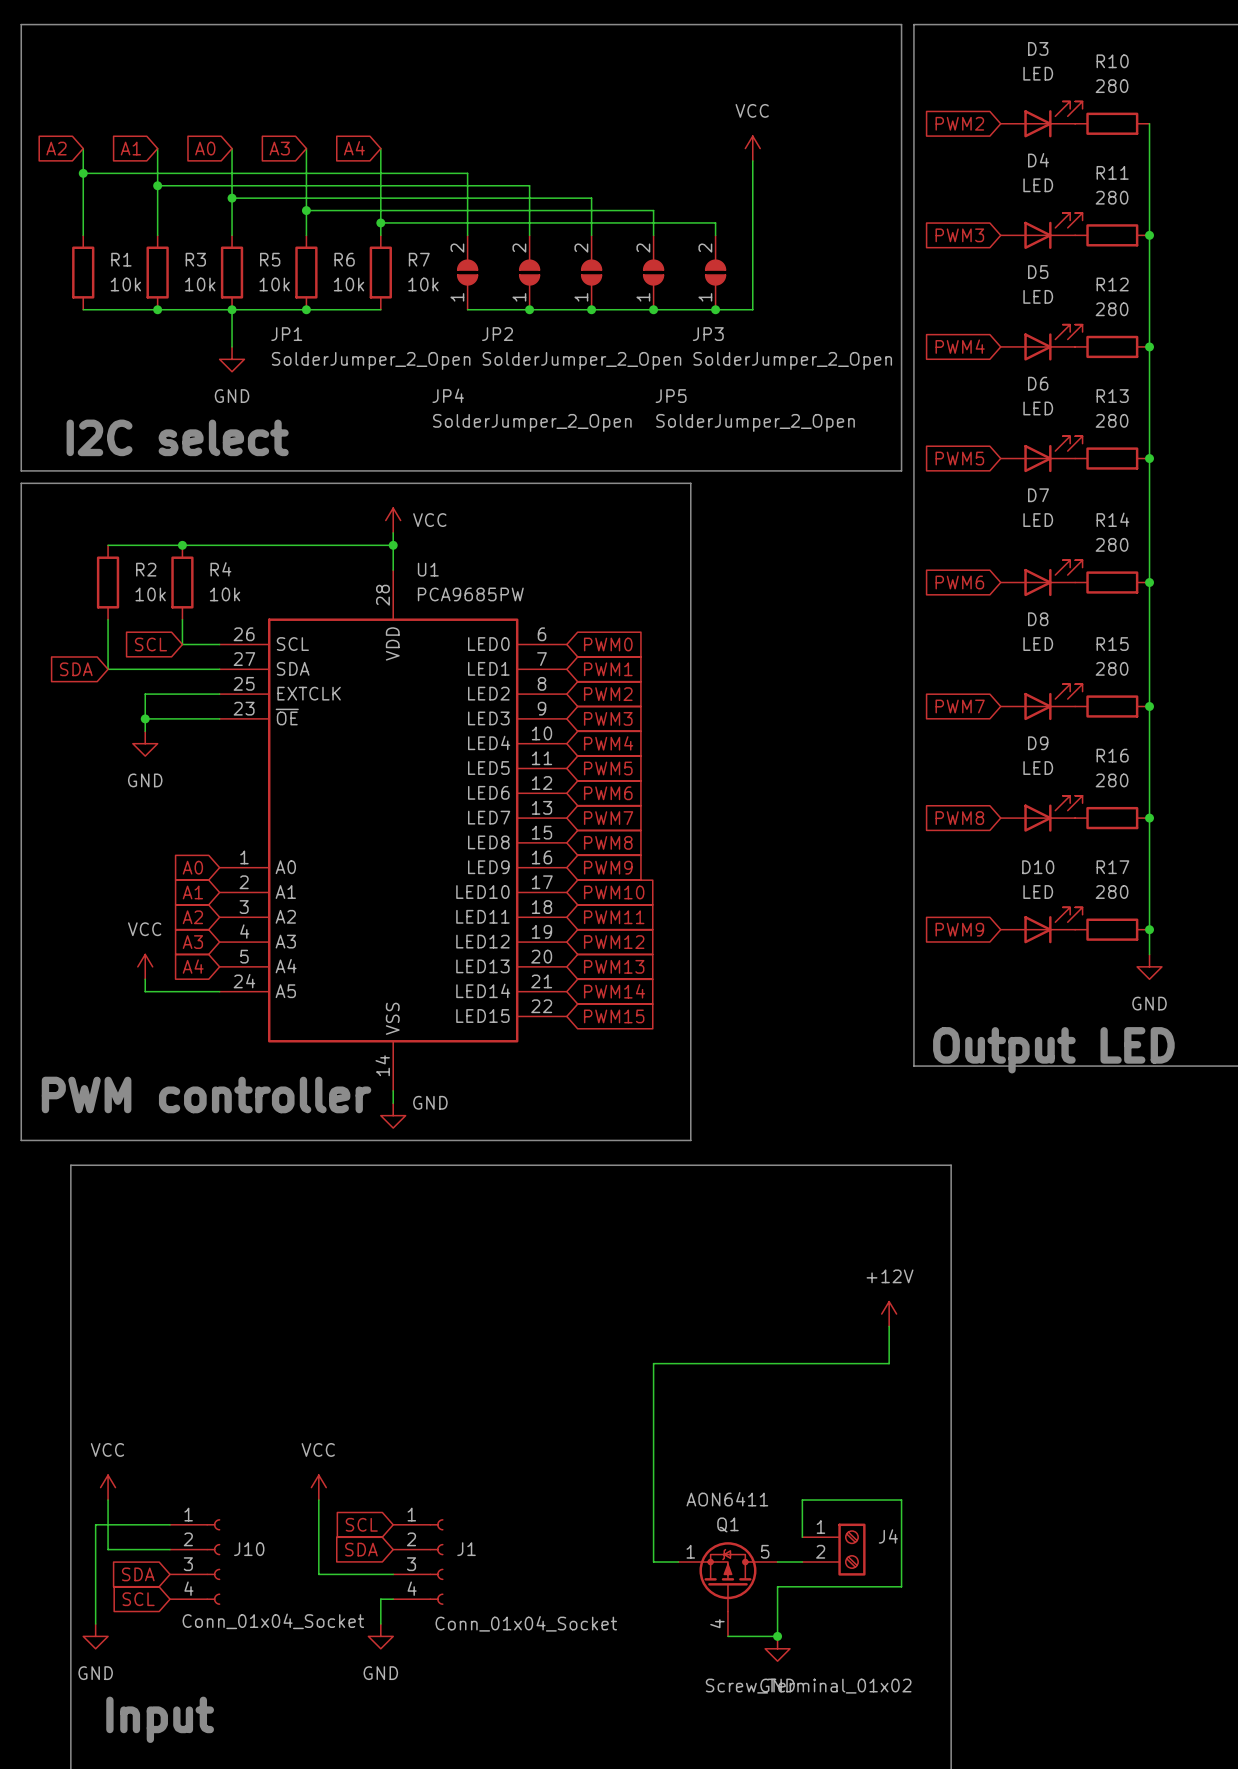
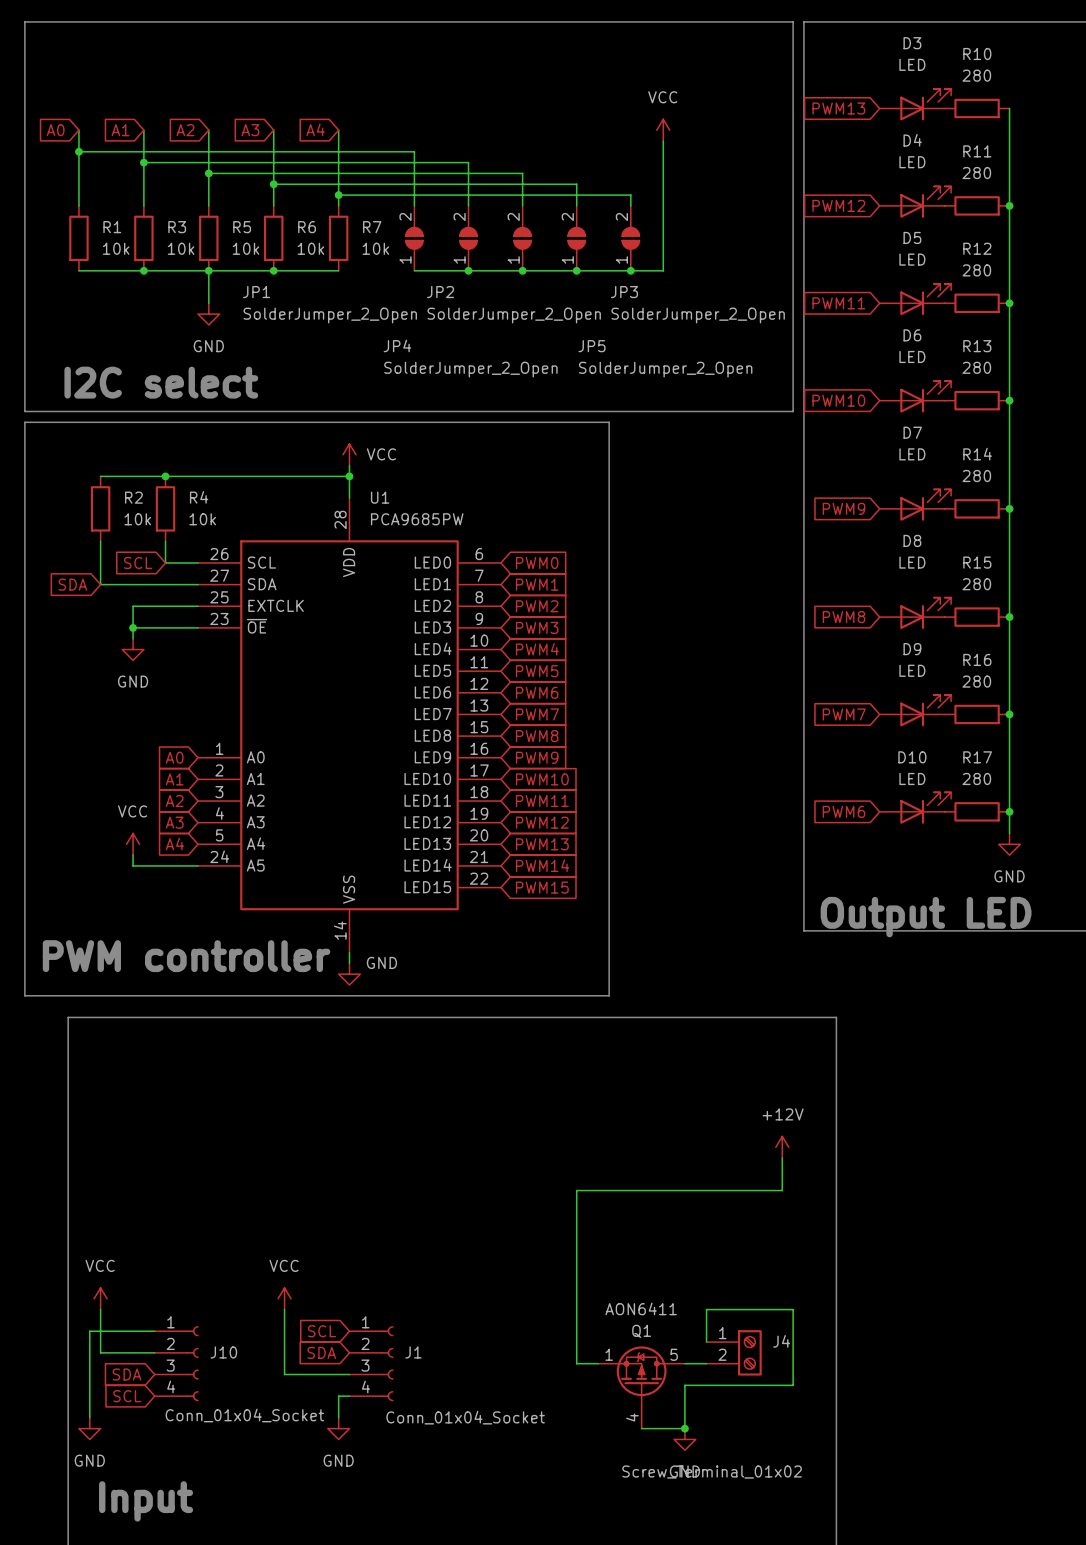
global label: PWM2 (959, 123) -> PWM13 (838, 108)
global label: A2 (56, 148) -> A0 (55, 130)
global label: A0 (205, 148) -> A2 (185, 130)
global label: PWM3 (959, 235) -> PWM12 (838, 205)
global label: PWM4 (960, 346) -> PWM11 (838, 303)
global label: PWM5 (959, 458) -> PWM10 (838, 400)
global label: PWM6 (959, 582) -> PWM9 (843, 508)
global label: PWM7 (960, 706) -> PWM8 (843, 617)
global label: PWM8 (959, 818) -> PWM7 (844, 714)
global label: PWM9 (959, 929) -> PWM6 (843, 811)

